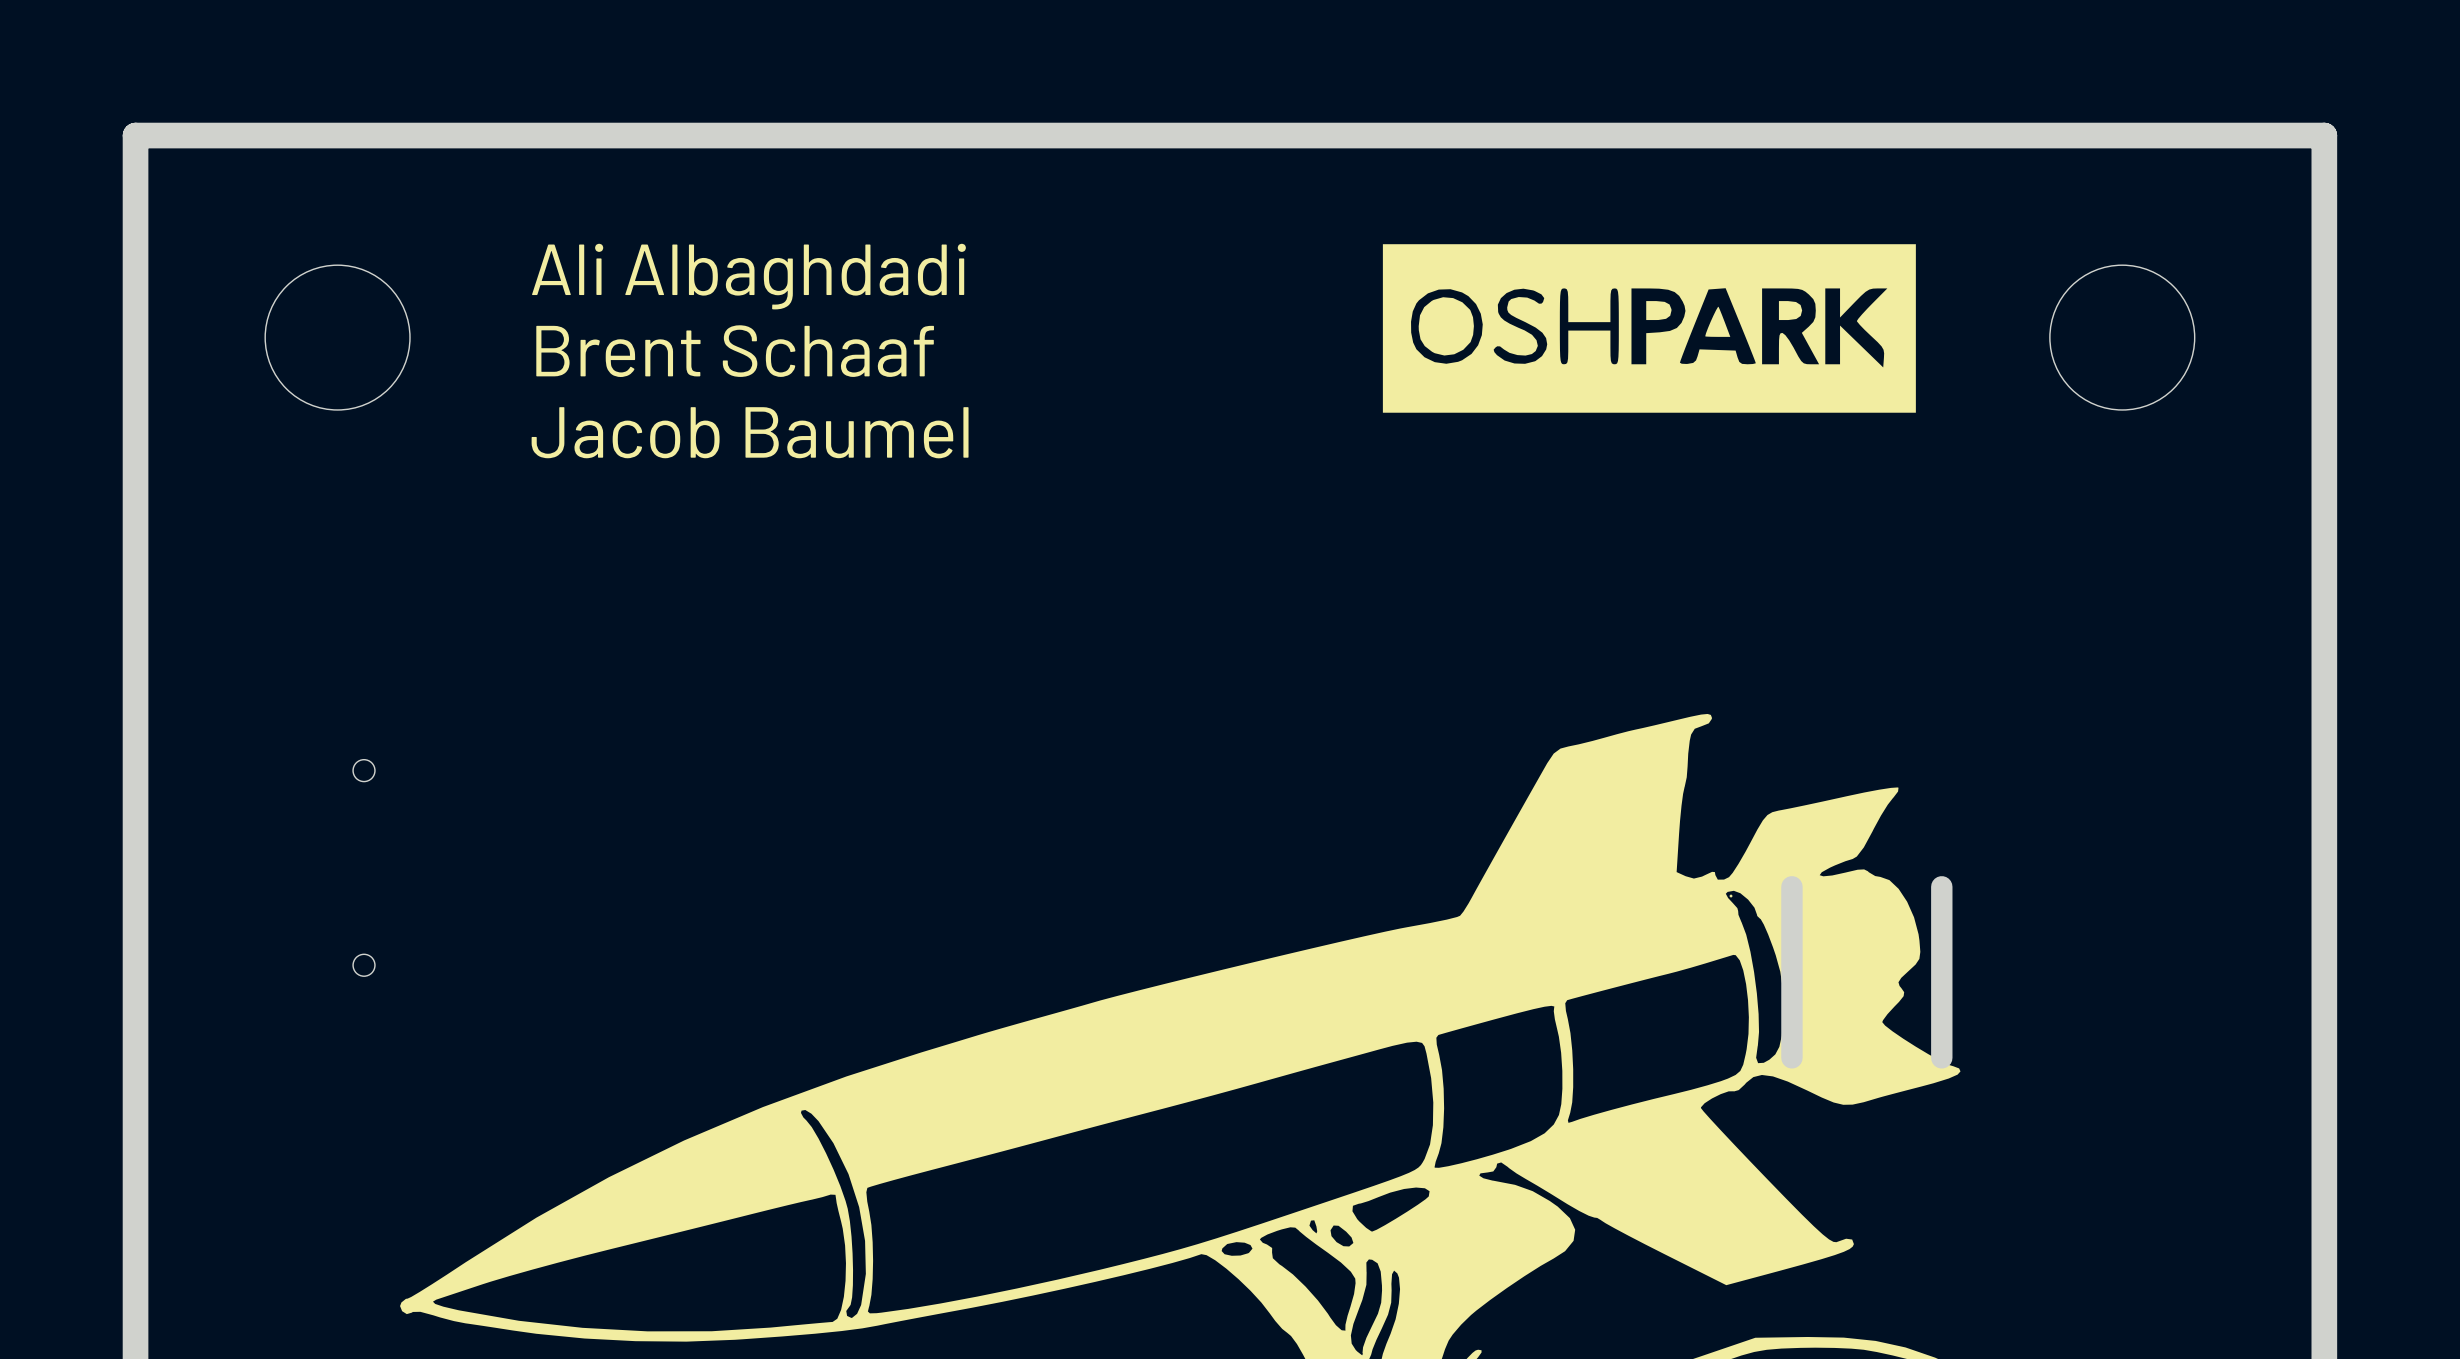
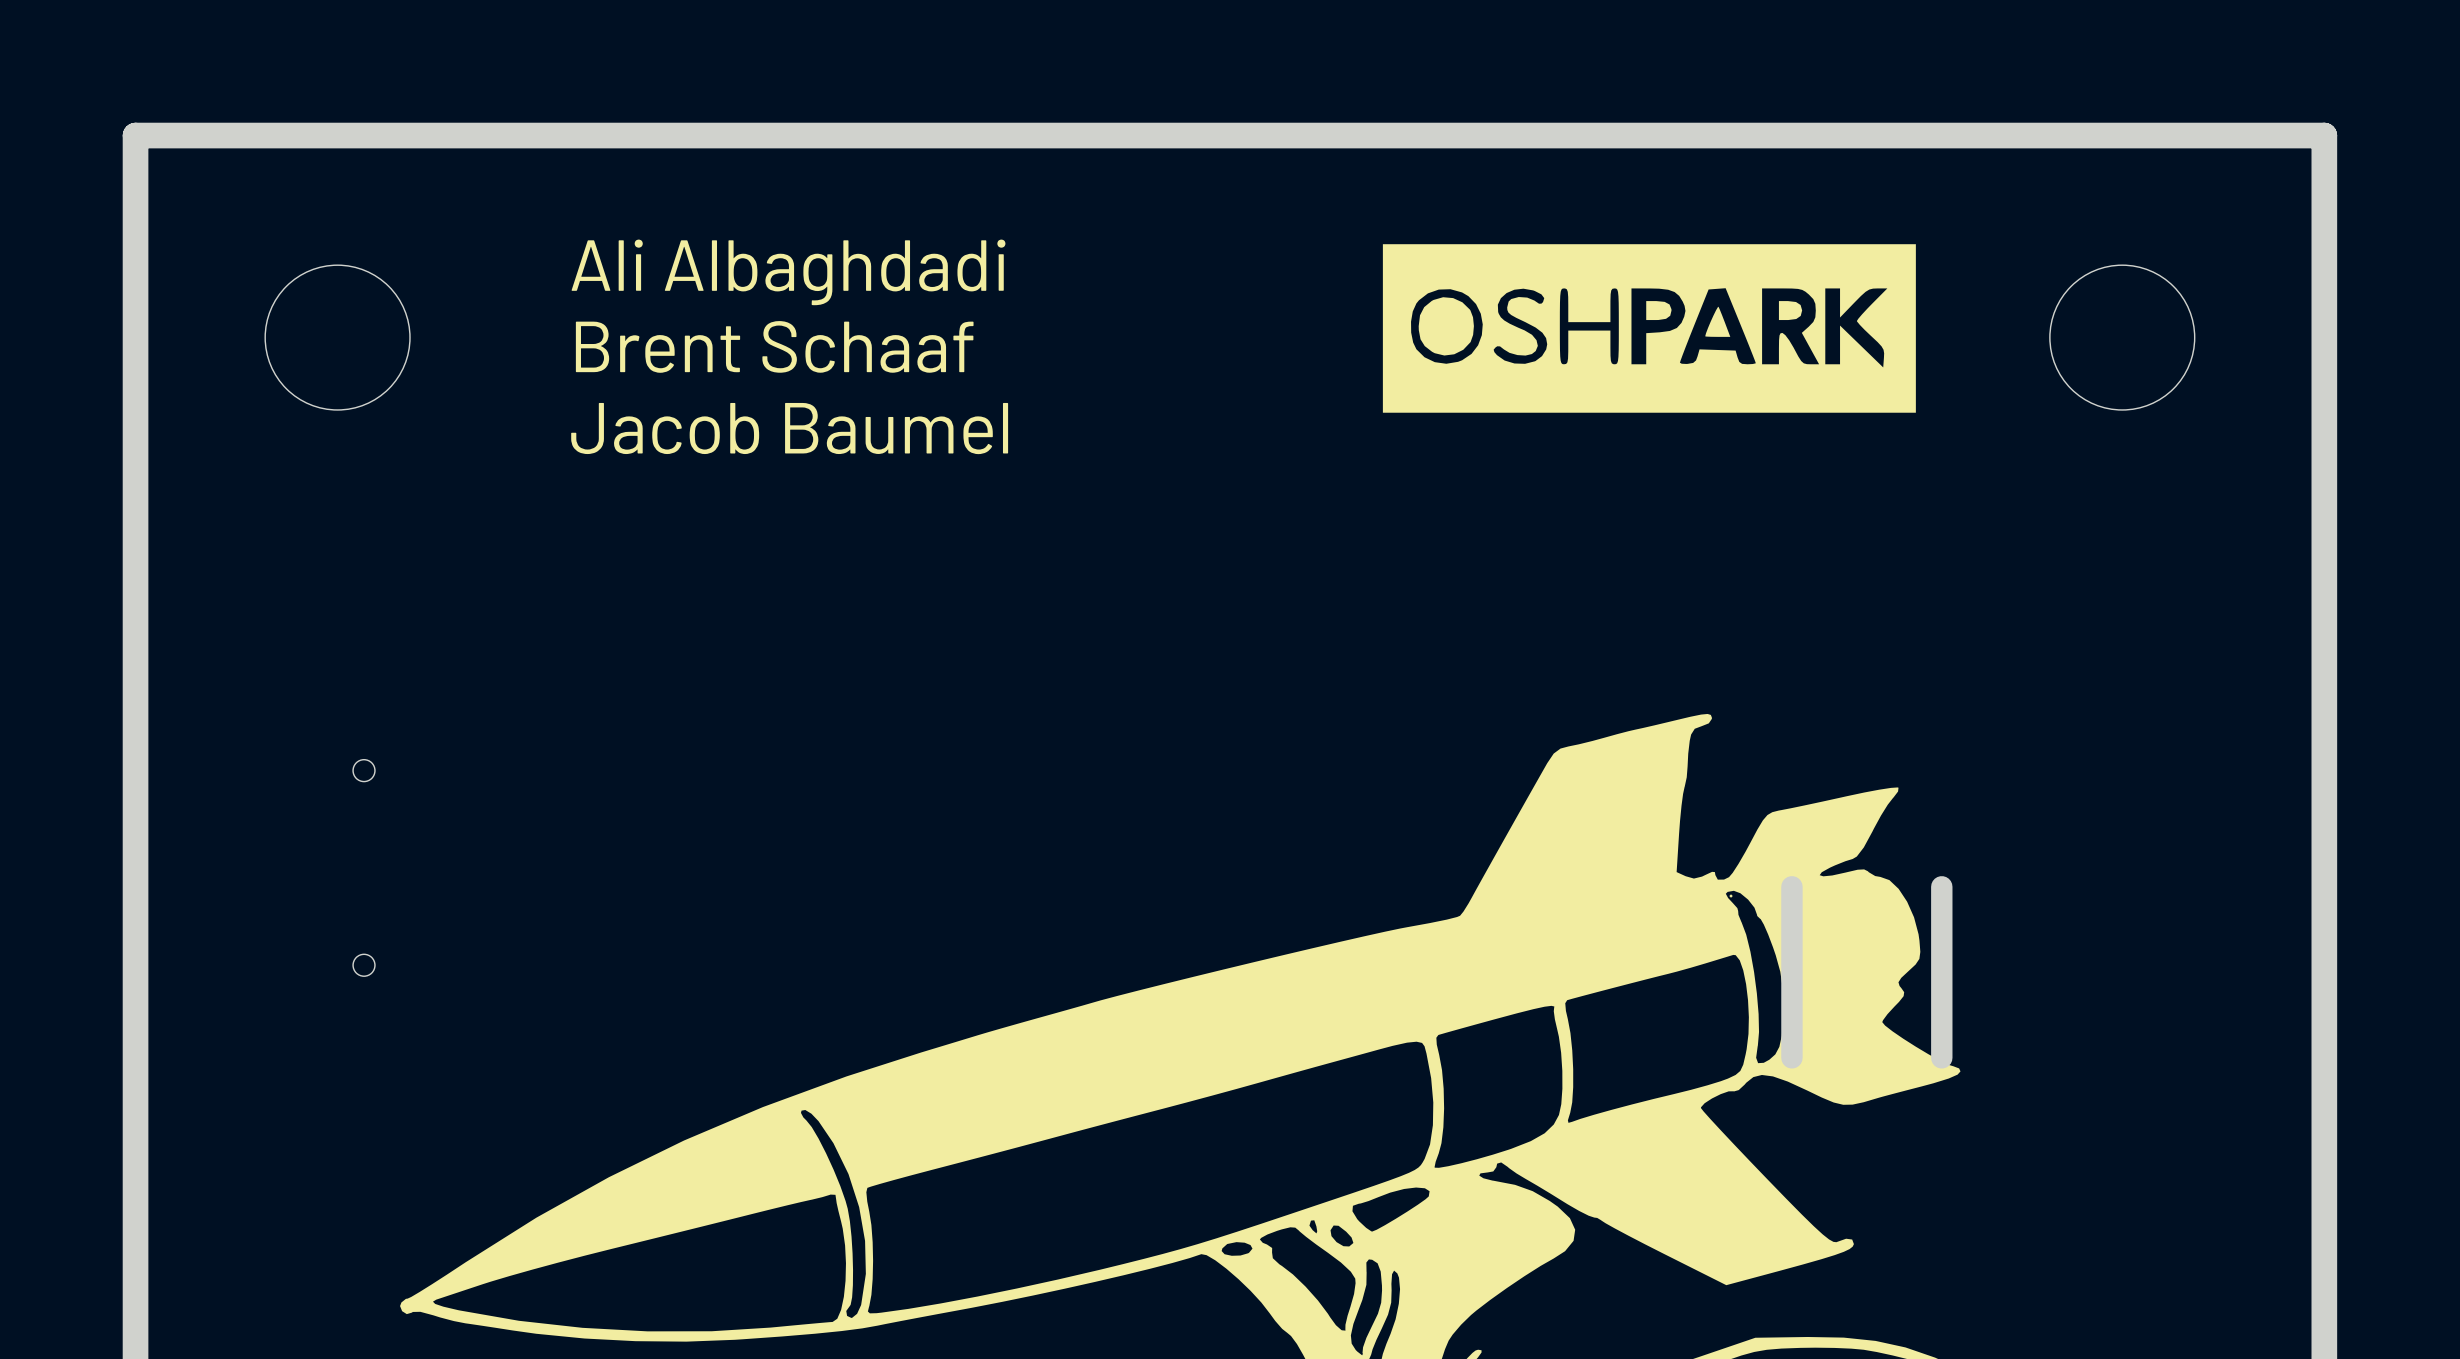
text position: Ali Albaghdadi (748, 276) -> Ali Albaghdadi (788, 272)
text position: Brent Schaaf (735, 351) -> Brent Schaaf (774, 346)
text position: Jacob Baumel (750, 432) -> Jacob Baumel (789, 428)

